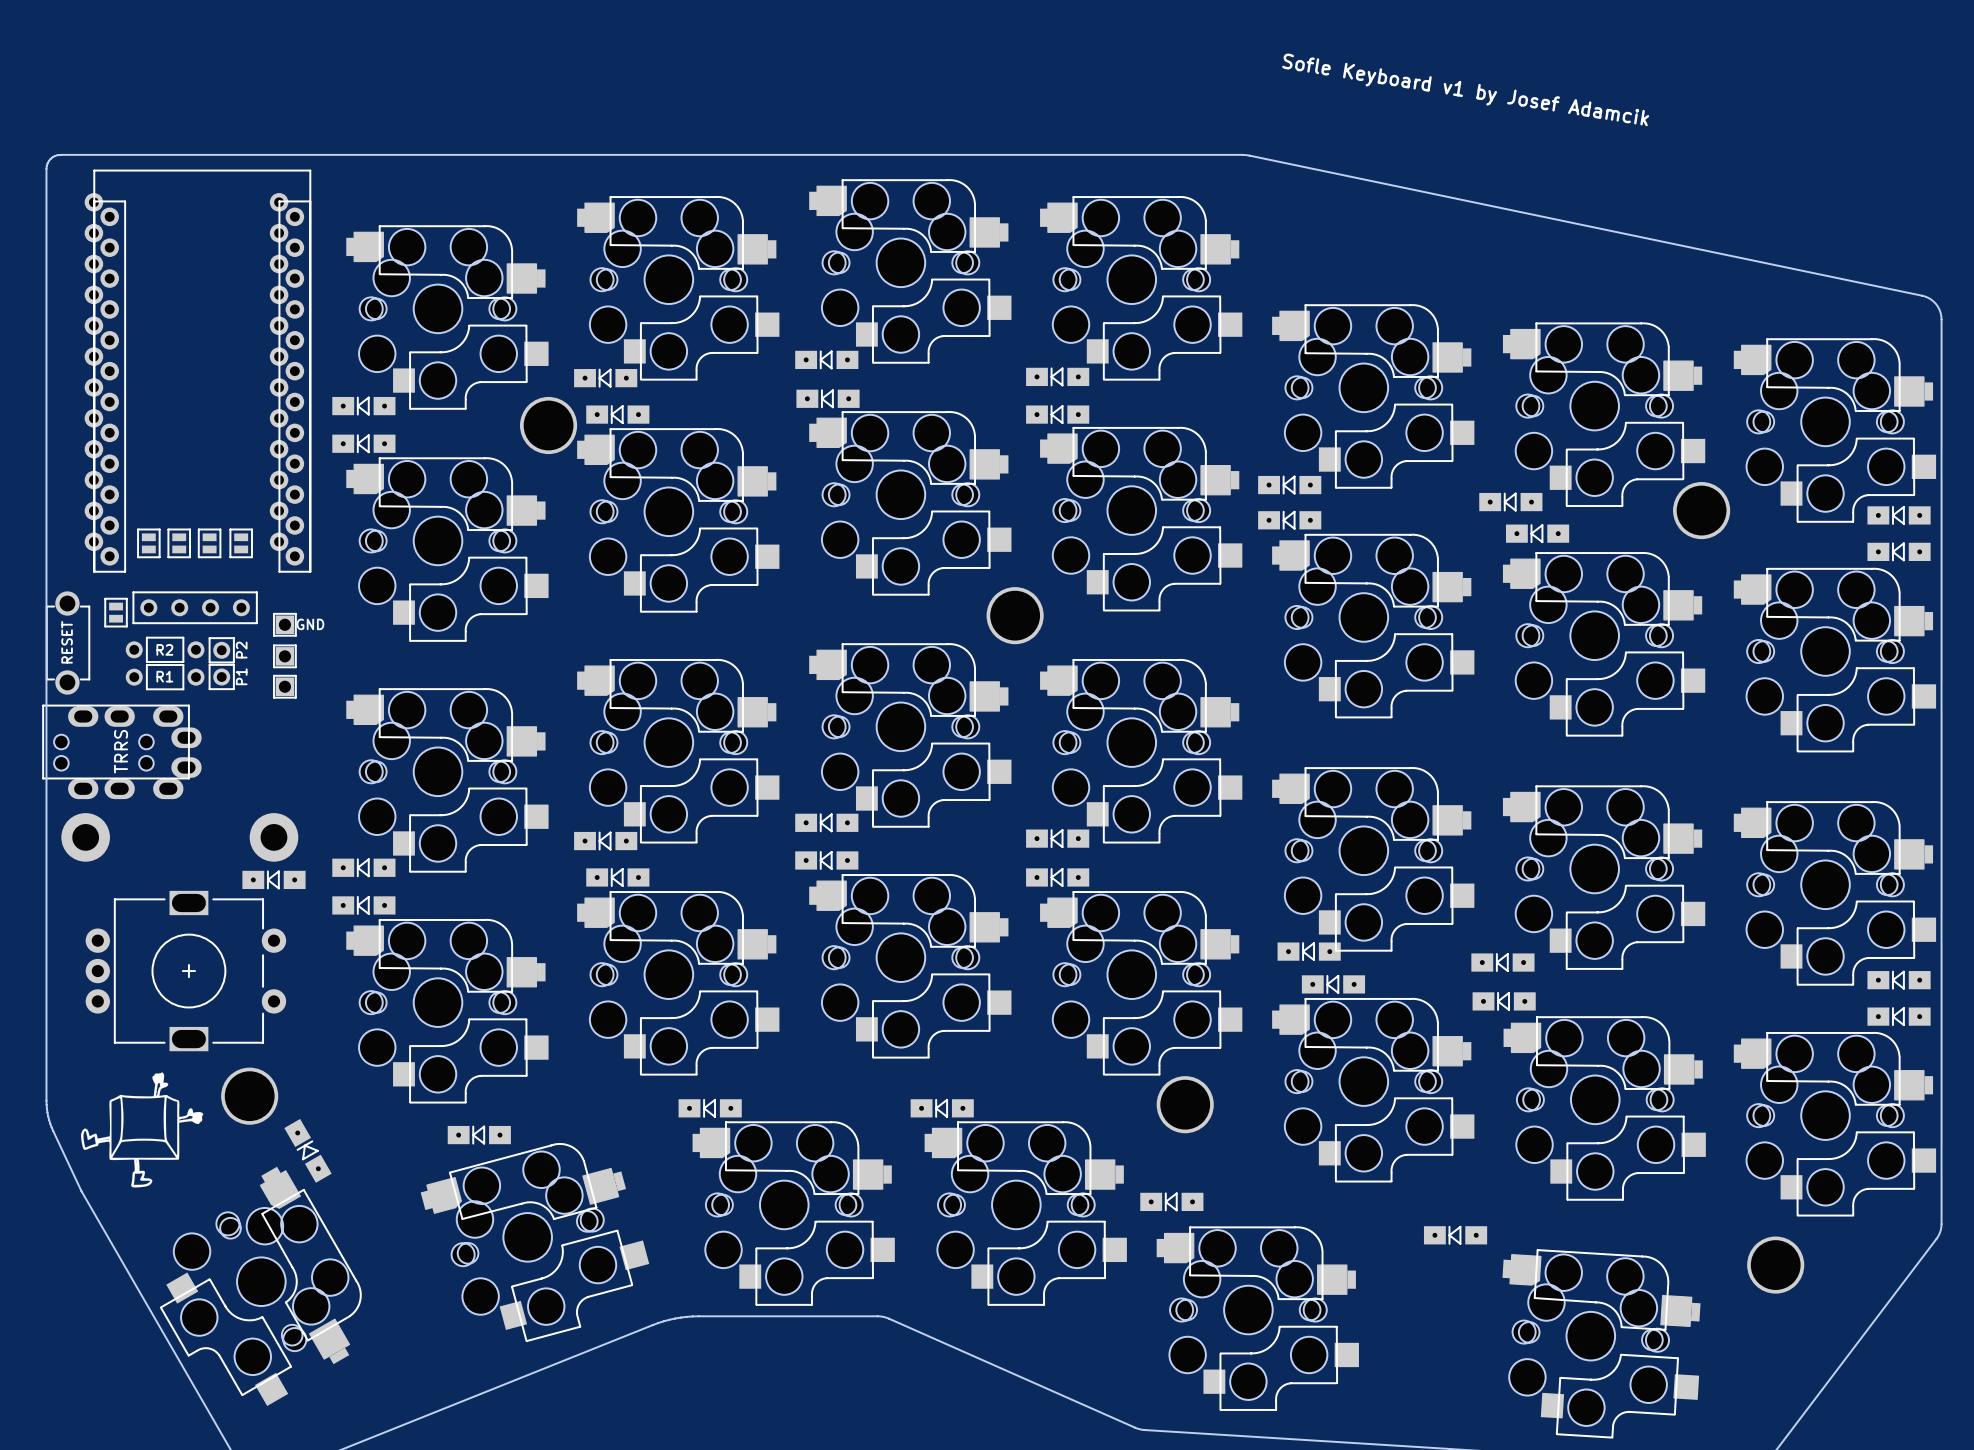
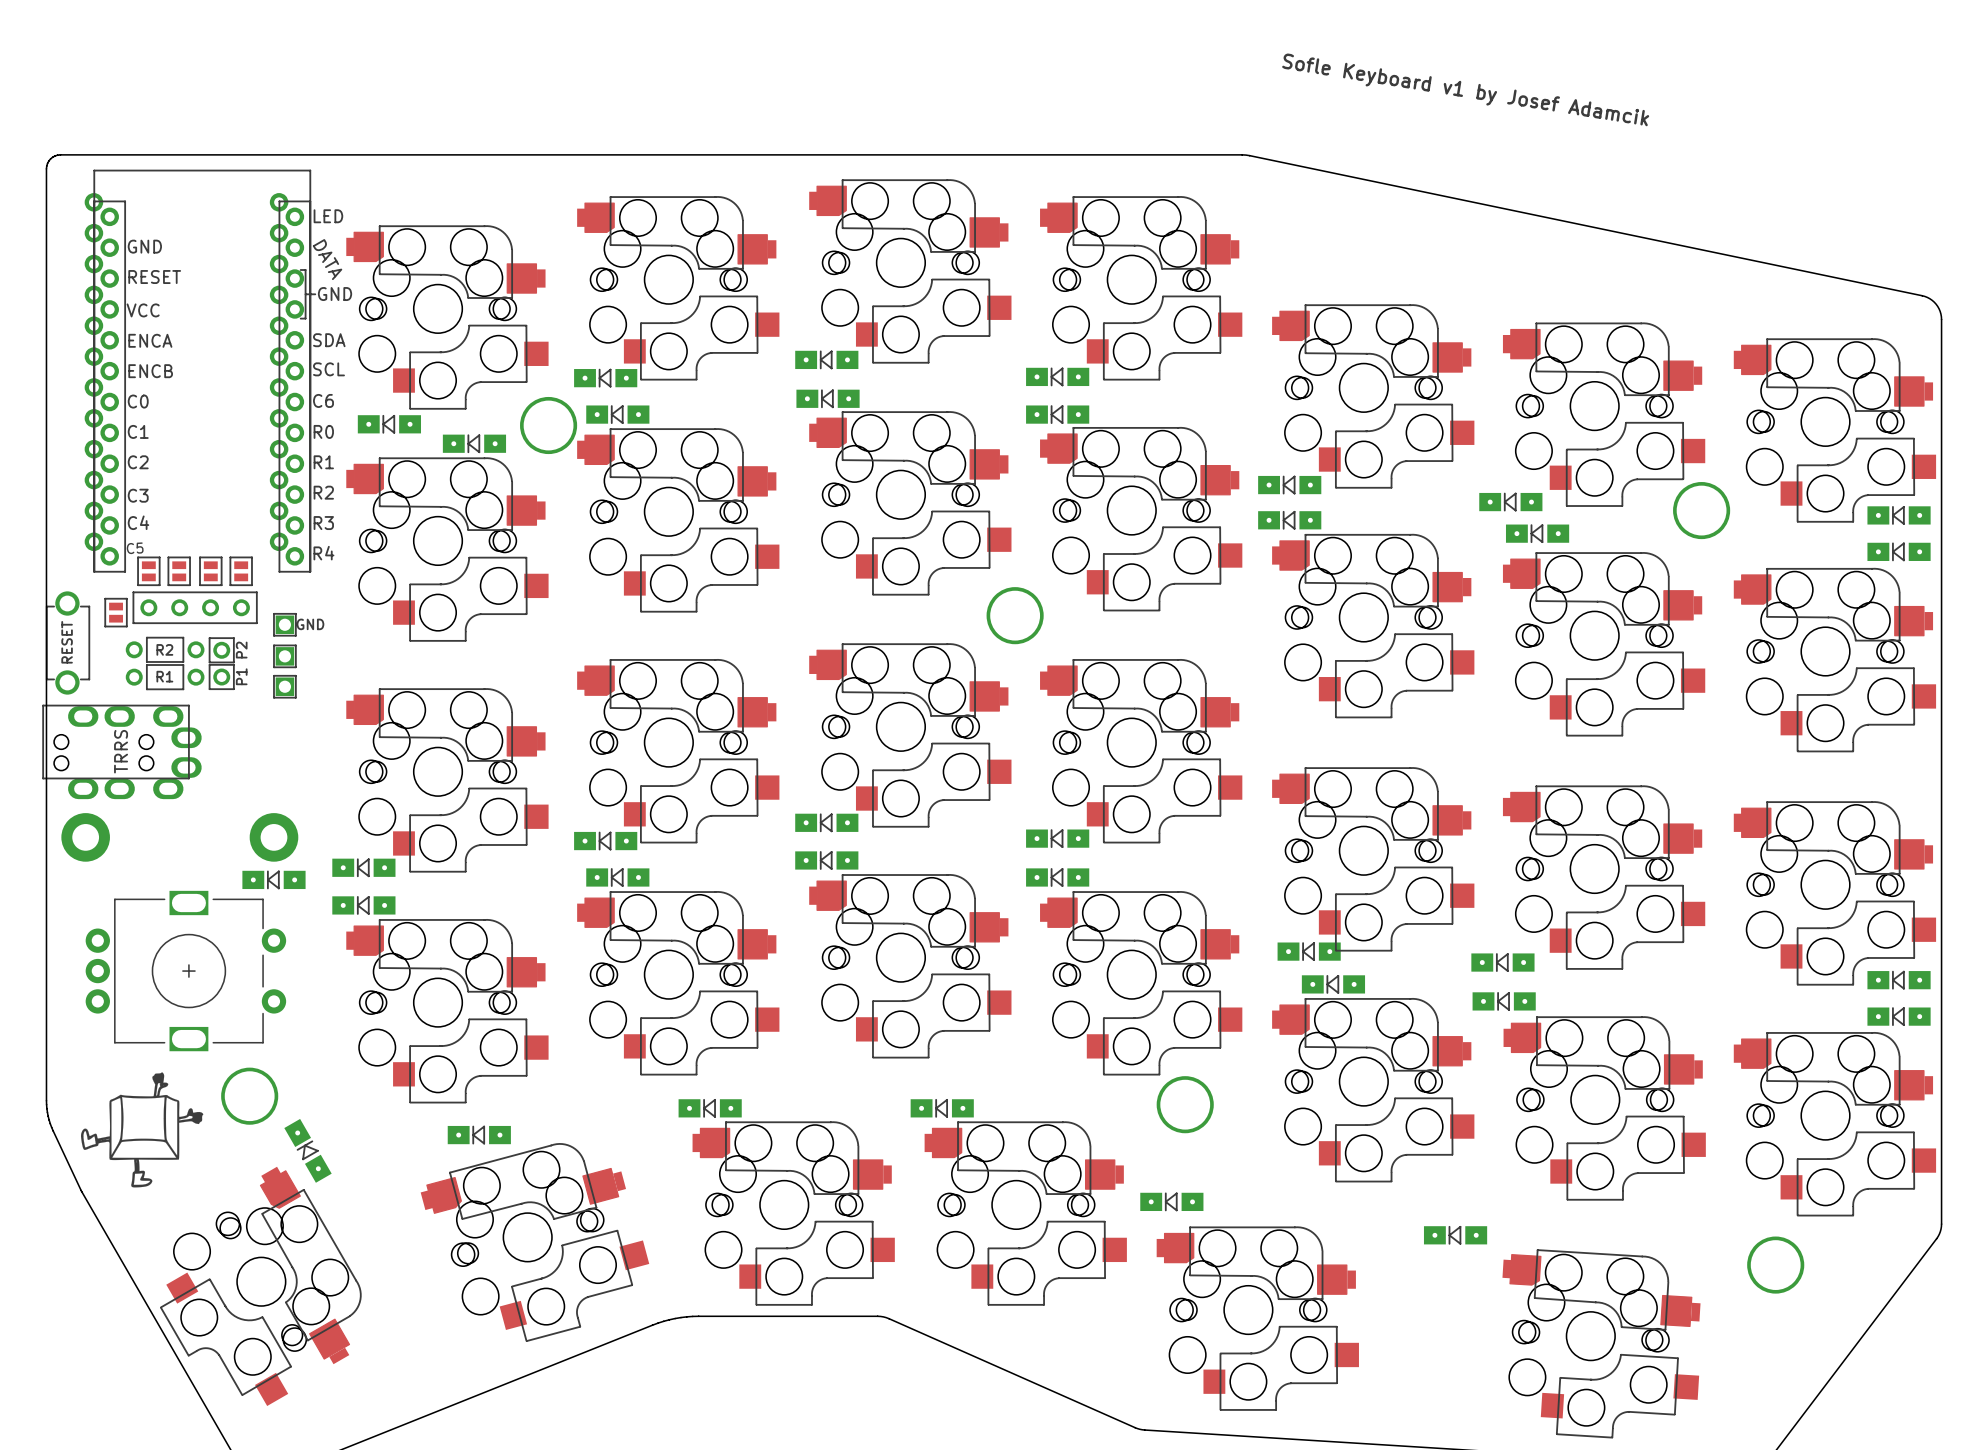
text: none -> LED (328, 216)
text: none -> GND (144, 246)
text: none -> DATA (327, 259)
line: none -> (300, 269) (305, 269) (305, 318) (300, 318)
text: none -> RESET (154, 277)
line: none -> (305, 294) (315, 294)
text: none -> GND (335, 294)
text: none -> VCC (143, 310)
text: none -> ENCA (150, 340)
text: none -> SDA (329, 340)
text: none -> SCL (328, 369)
text: none -> ENCB (150, 371)
text: none -> C6 (323, 400)
text: none -> C0 (138, 401)
part: (363, 406) -> none
part: none -> (389, 424)
text: none -> C1 (138, 431)
text: none -> R0 (323, 431)
part: (363, 443) -> none
part: none -> (474, 443)
text: none -> C2 (138, 462)
text: none -> R1 (323, 462)
text: none -> R2 (323, 492)
text: none -> C3 (138, 495)
text: none -> C4 (138, 522)
text: none -> R3 (323, 523)
part: (148, 543) -> none
part: (179, 543) -> none
part: (209, 543) -> none
part: (241, 543) -> none
text: none -> C5 (135, 548)
text: none -> R4 (323, 553)
part: none -> (148, 571)
part: none -> (179, 571)
part: none -> (210, 571)
part: none -> (241, 571)

